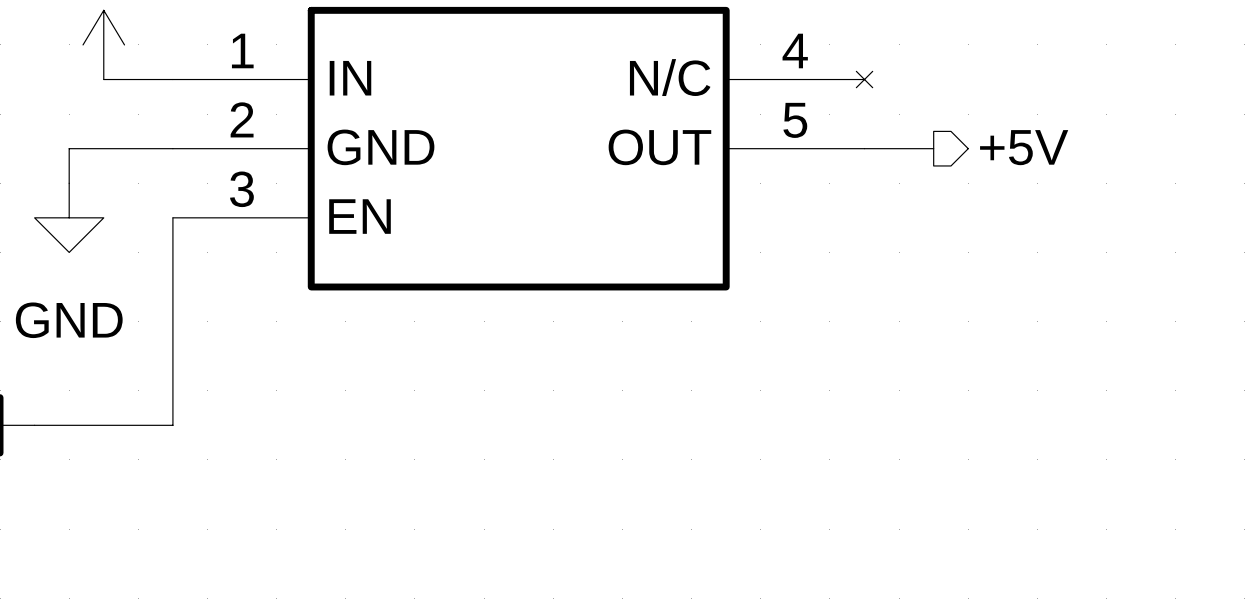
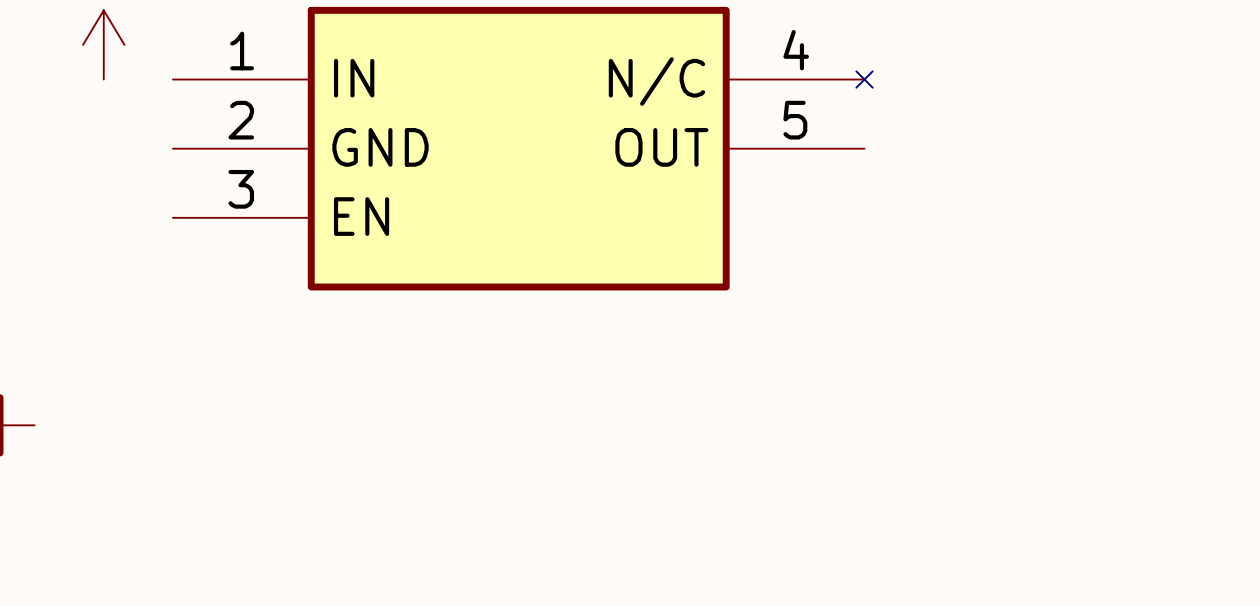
wire: (103, 79) (172, 79) -> none
hierarchical label: +5V (1024, 147) -> none
wire: (172, 148) (69, 148) (69, 183) -> none
wire: (864, 148) (933, 148) -> none
power symbol: GND (69, 217) -> none
wire: (172, 217) (172, 425) (34, 425) -> none

